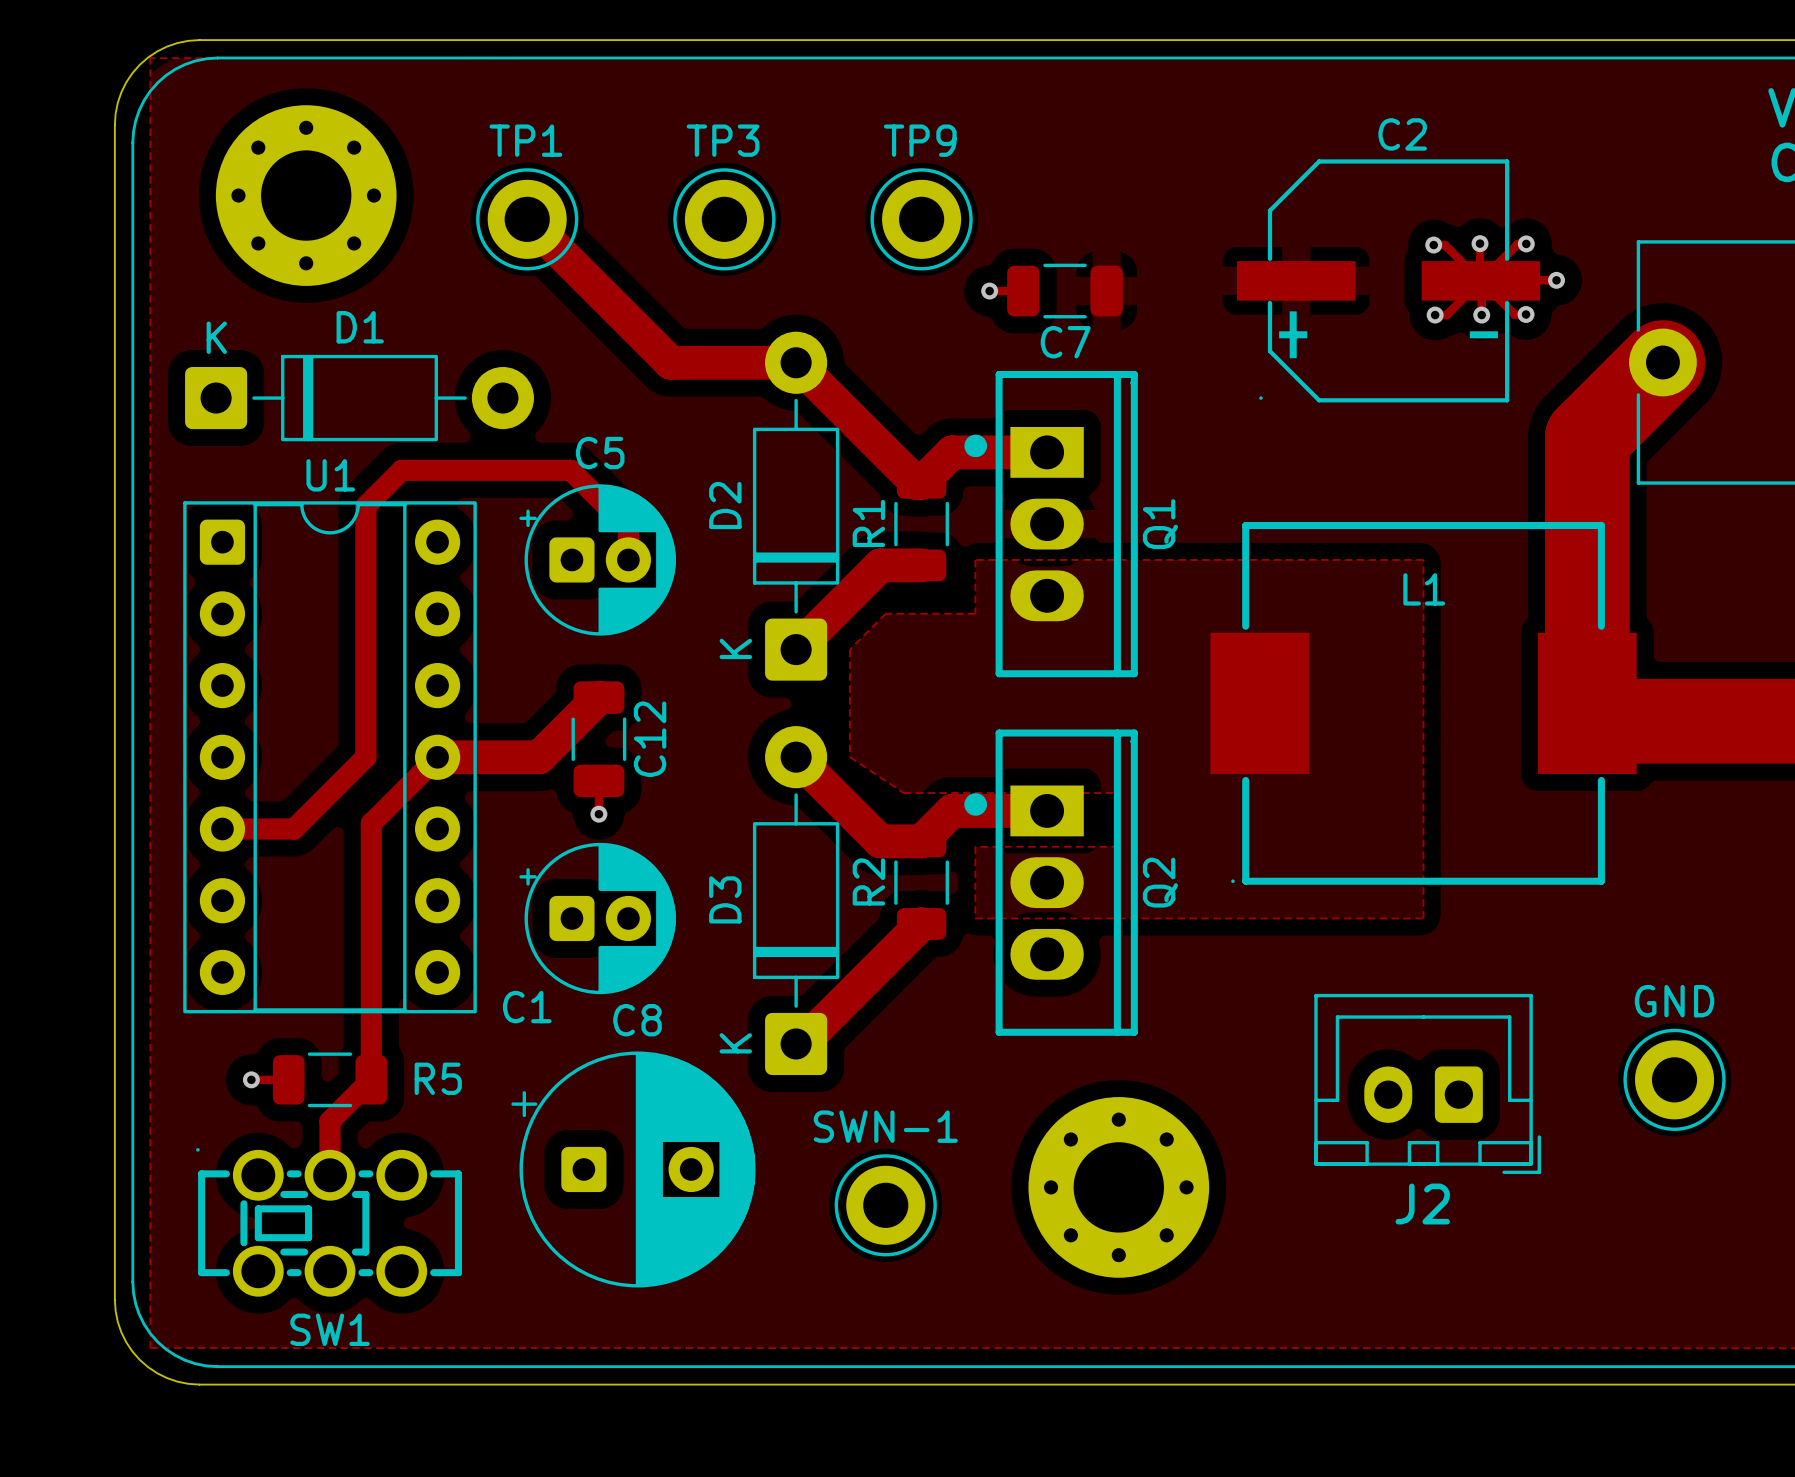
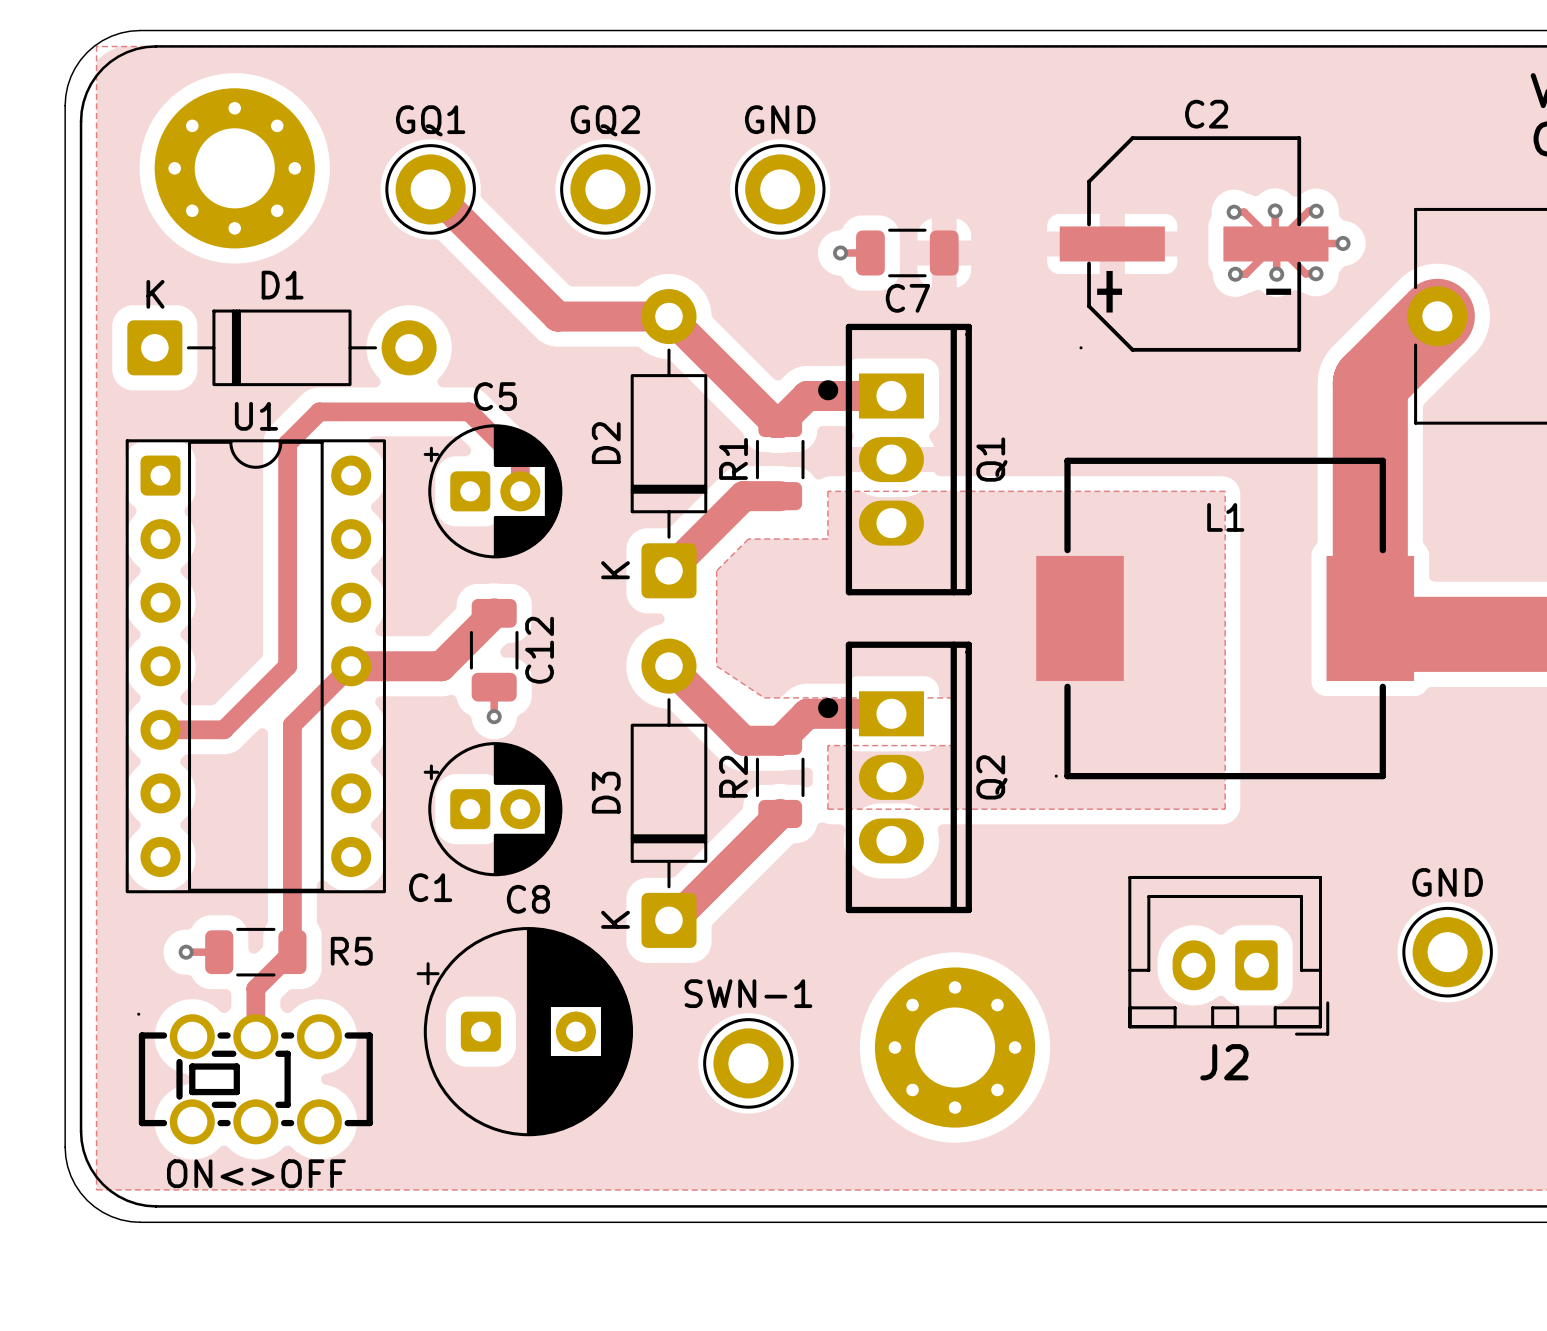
TP1 name: TP1 (525, 140) -> GQ1 (430, 120)
TP3 name: TP3 (723, 140) -> GQ2 (605, 120)
TP9 name: TP9 (920, 140) -> GND (780, 119)
SW1 name: SW1 (330, 1329) -> ON<>OFF (256, 1173)

